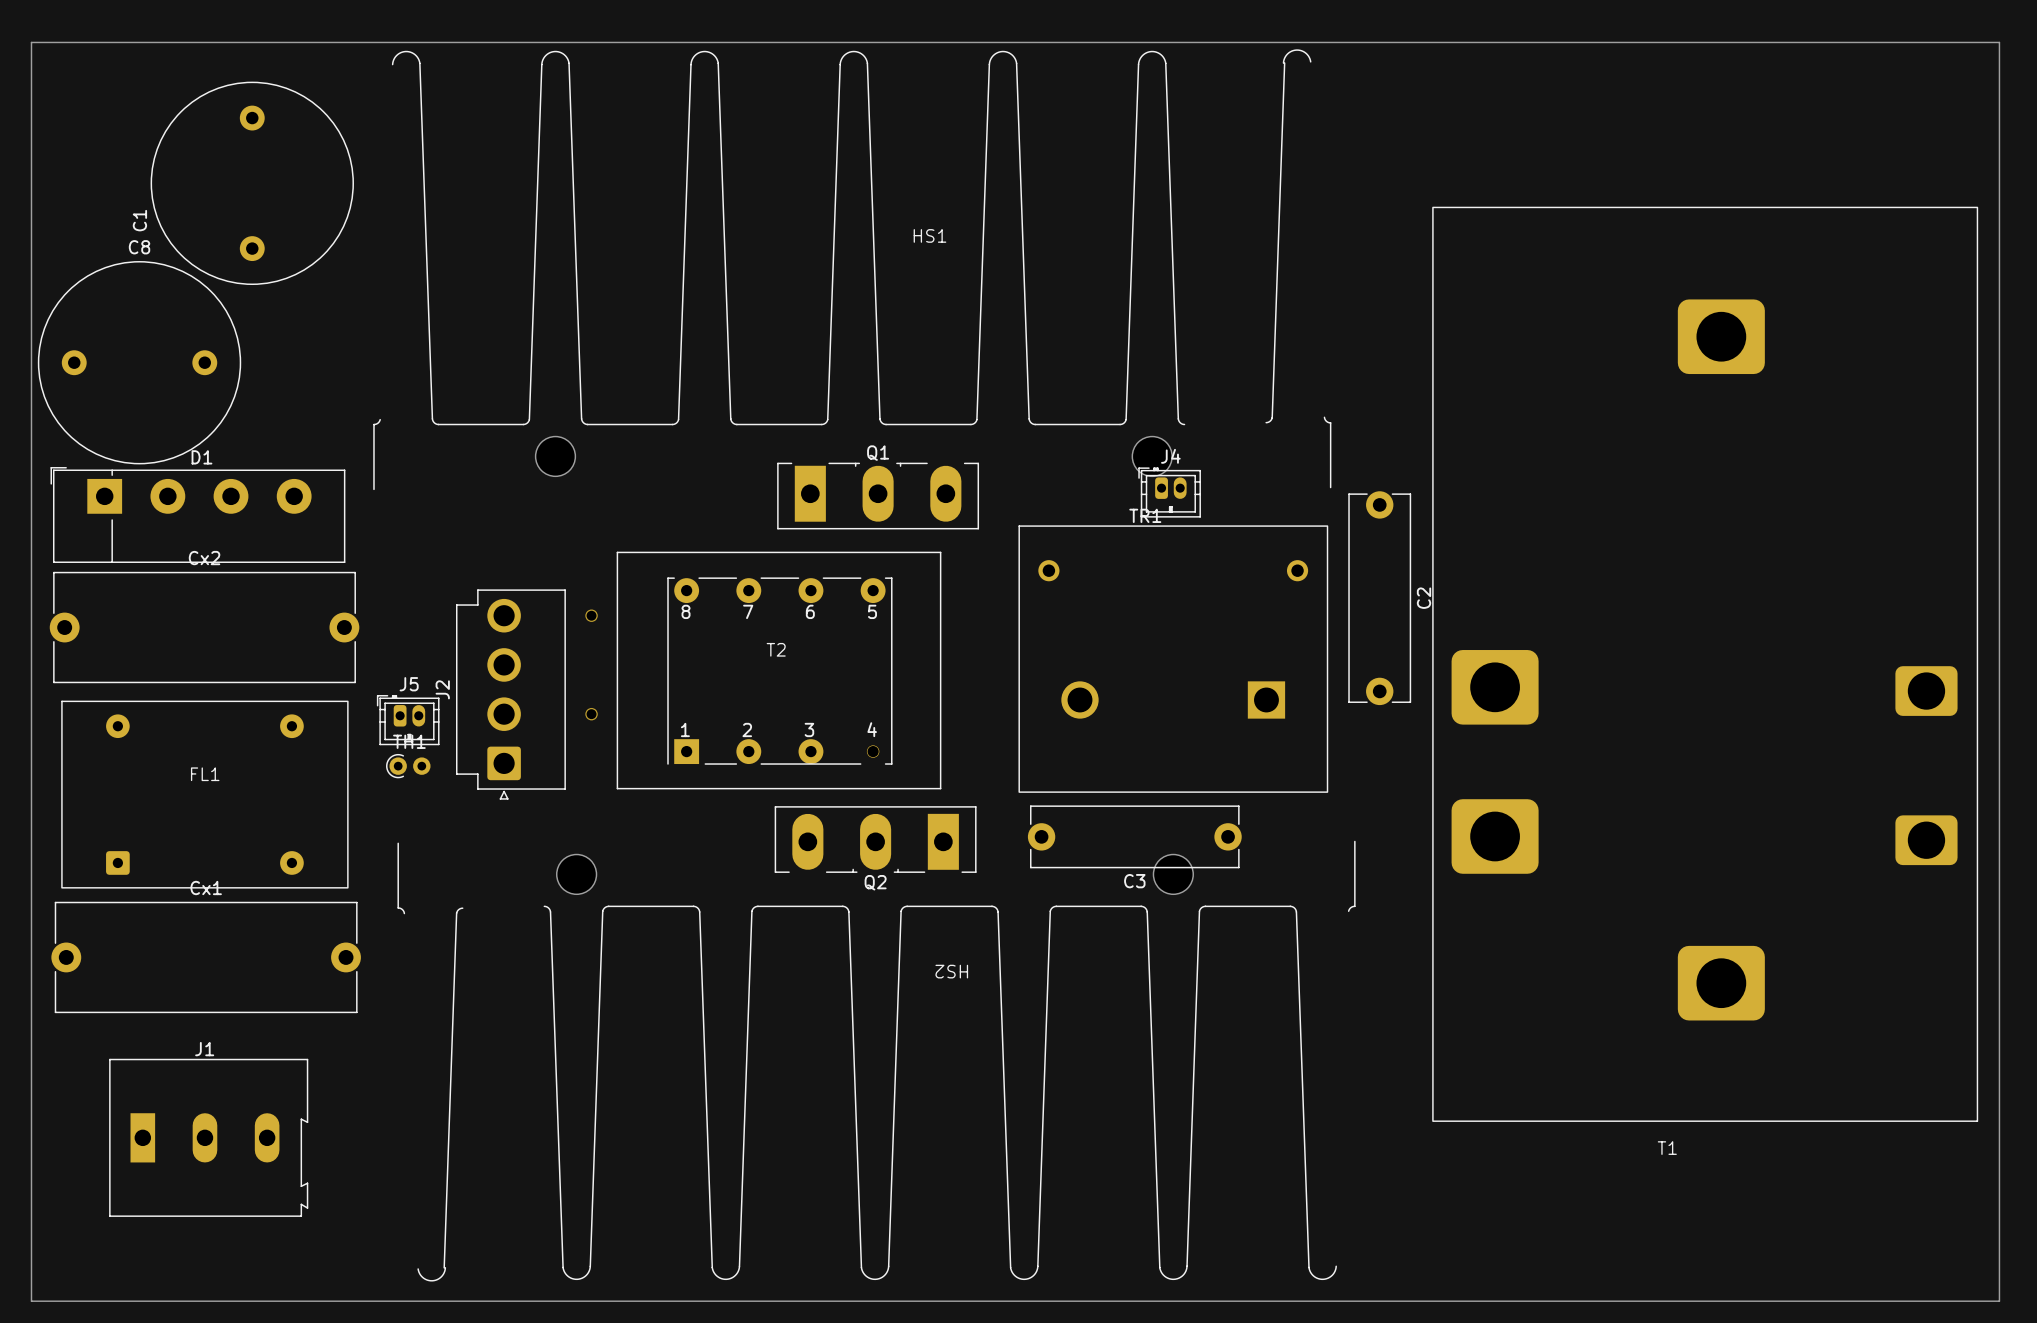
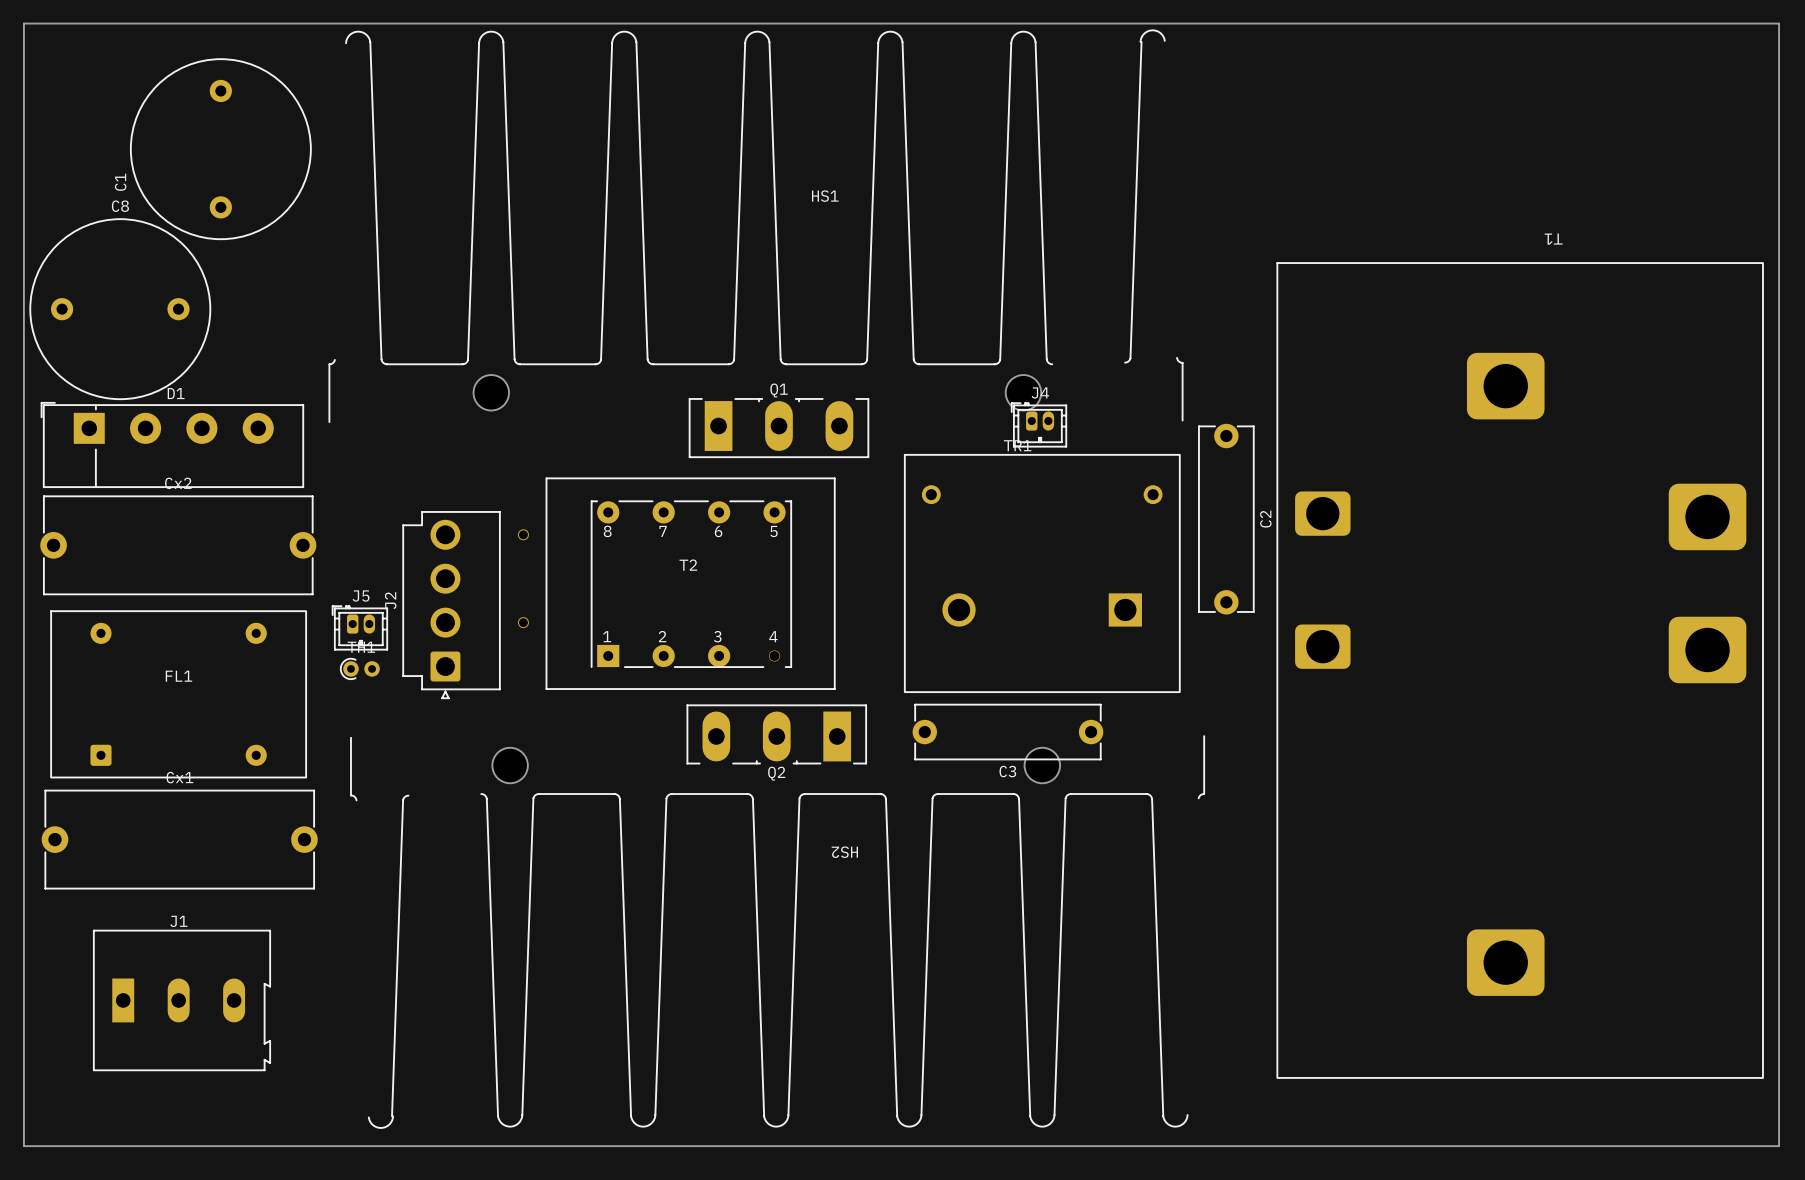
T1 rotation: 0° (1705, 664) -> 180° (1520, 670)

